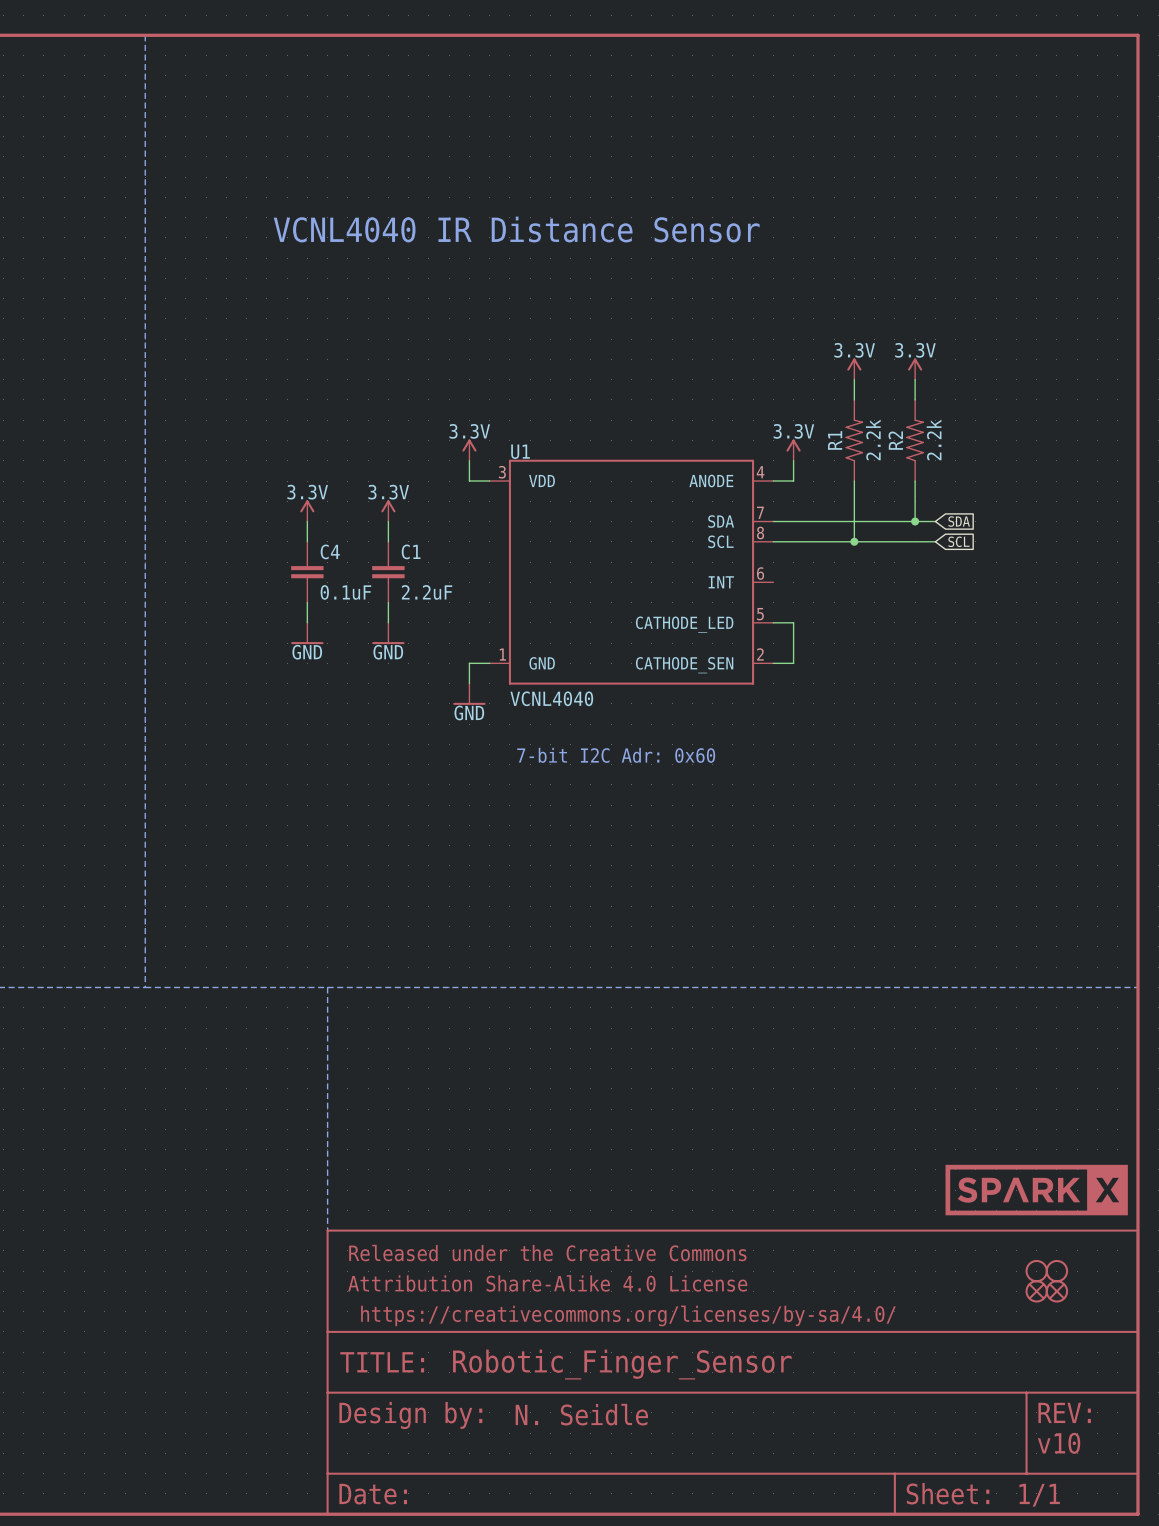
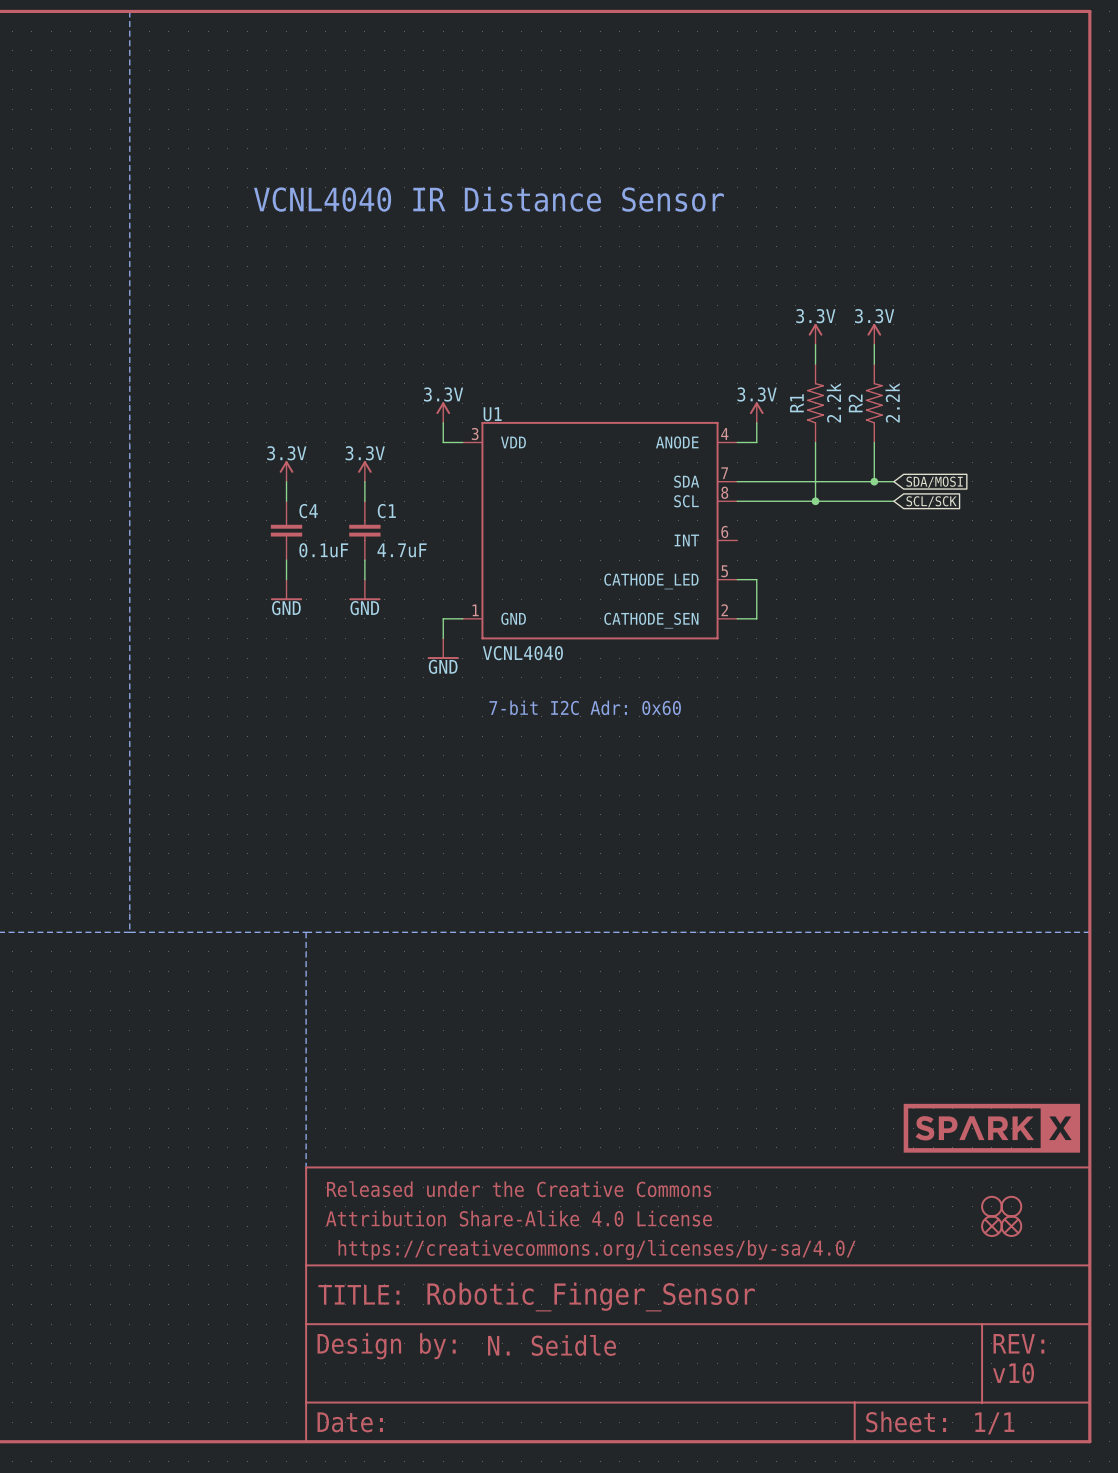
global label: SDA (959, 521) -> SDA/MOSI (934, 482)
global label: SCL (958, 541) -> SCL/SCK (931, 501)
C1 value: 2.2uF (427, 592) -> 4.7uF (402, 550)

